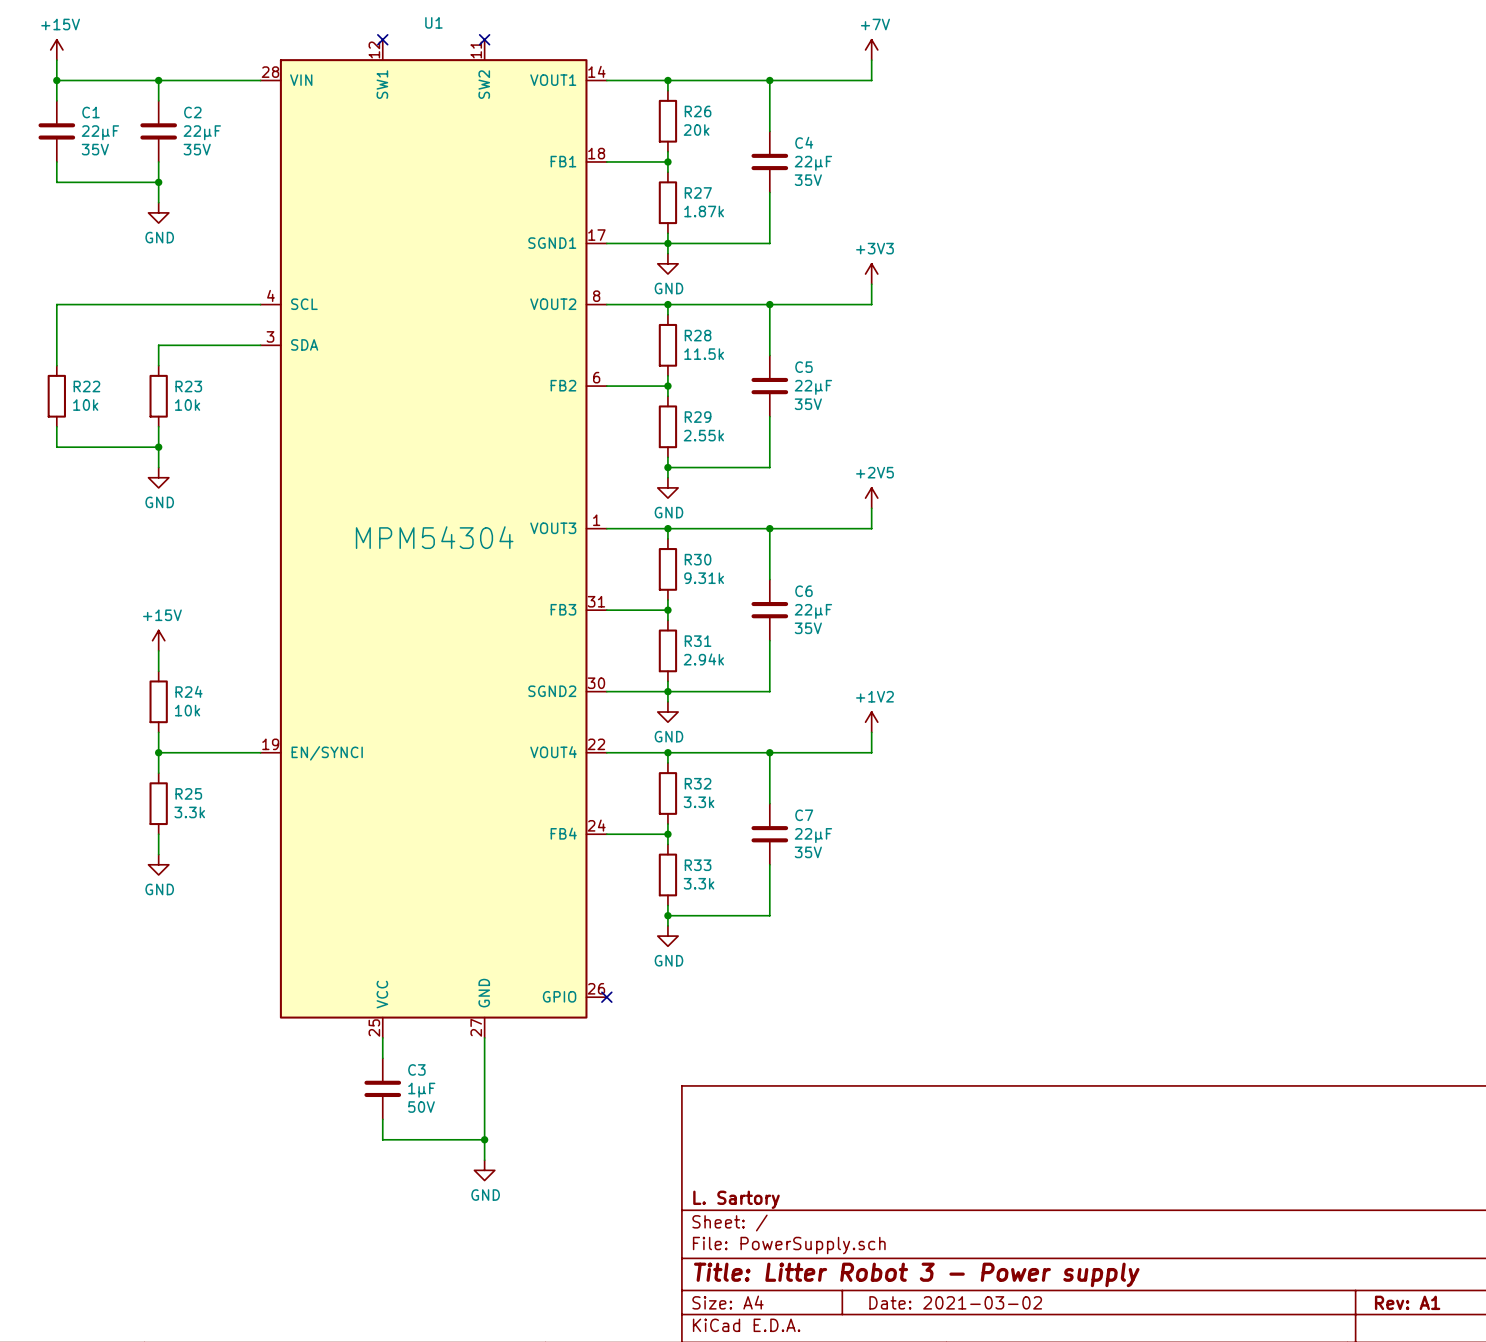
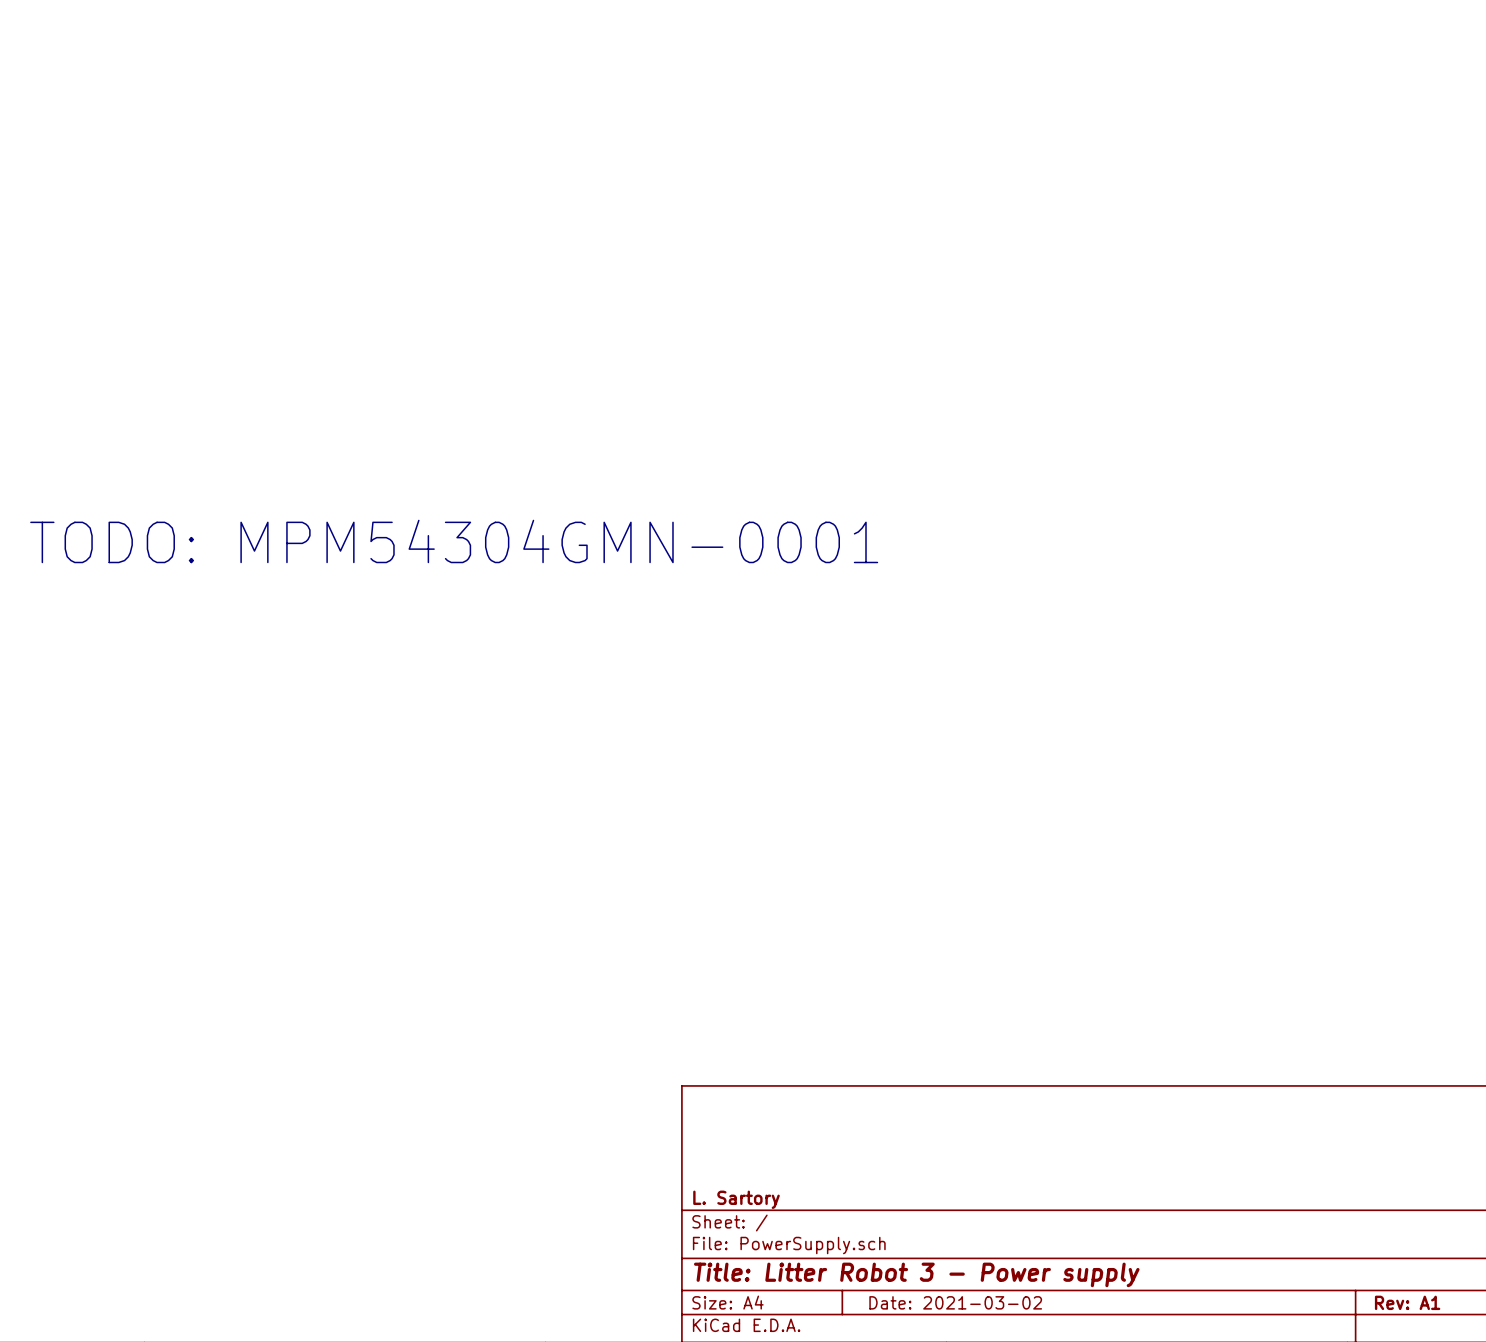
no-connect mark: (382, 39) -> none
no-connect mark: (484, 39) -> none
power symbol: +15V (56, 49) -> none
power symbol: +7V (871, 49) -> none
wire: (56, 60) (56, 100) -> none
wire: (871, 60) (871, 80) (606, 80) -> none
wire: (56, 80) (260, 80) -> none
junction: (56, 80) -> none
wire: (158, 80) (158, 100) -> none
junction: (158, 80) -> none
wire: (667, 80) (667, 90) -> none
junction: (667, 80) -> none
wire: (769, 80) (769, 131) -> none
junction: (769, 80) -> none
R26: 20k (667, 121) -> none
C1: 22µF (56, 131) -> none
C2: 22µF (158, 131) -> none
wire: (667, 151) (667, 172) -> none
wire: (56, 161) (56, 182) (158, 182) -> none
wire: (158, 161) (158, 202) -> none
wire: (606, 161) (667, 161) -> none
junction: (667, 161) -> none
C4: 22µF (769, 161) -> none
junction: (158, 182) -> none
wire: (769, 192) (769, 243) (606, 243) -> none
R27: 1.87k (667, 202) -> none
power symbol: GND (158, 212) -> none
wire: (667, 233) (667, 253) -> none
junction: (667, 243) -> none
power symbol: GND (667, 263) -> none
power symbol: +3V3 (871, 274) -> none
wire: (871, 284) (871, 304) (606, 304) -> none
wire: (260, 304) (56, 304) (56, 365) -> none
wire: (667, 304) (667, 314) -> none
junction: (667, 304) -> none
wire: (769, 304) (769, 355) -> none
junction: (769, 304) -> none
wire: (260, 345) (158, 345) (158, 365) -> none
R28: 11.5k (667, 345) -> none
wire: (667, 375) (667, 396) -> none
wire: (606, 386) (667, 386) -> none
junction: (667, 386) -> none
C5: 22µF (769, 386) -> none
R22: 10k (56, 396) -> none
R23: 10k (158, 396) -> none
wire: (769, 416) (769, 467) (667, 467) -> none
wire: (56, 426) (56, 447) (158, 447) -> none
wire: (158, 426) (158, 467) -> none
R29: 2.55k (667, 426) -> none
junction: (158, 447) -> none
wire: (667, 457) (667, 477) -> none
junction: (667, 467) -> none
power symbol: GND (158, 477) -> none
power symbol: GND (667, 487) -> none
power symbol: +2V5 (871, 498) -> none
wire: (871, 508) (871, 528) (606, 528) -> none
wire: (667, 528) (667, 538) -> none
junction: (667, 528) -> none
wire: (769, 528) (769, 579) -> none
junction: (769, 528) -> none
U1: MPM54304 (433, 538) -> none
text: none -> TODO: MPM54304GMN-0001 (454, 541)
R30: 9.31k (667, 569) -> none
wire: (667, 599) (667, 620) -> none
wire: (606, 610) (667, 610) -> none
junction: (667, 610) -> none
C6: 22µF (769, 610) -> none
power symbol: +15V (158, 640) -> none
wire: (769, 640) (769, 691) (606, 691) -> none
wire: (158, 650) (158, 671) -> none
R31: 2.94k (667, 650) -> none
wire: (667, 681) (667, 701) -> none
junction: (667, 691) -> none
R24: 10k (158, 701) -> none
power symbol: GND (667, 712) -> none
power symbol: +1V2 (871, 722) -> none
wire: (158, 732) (158, 773) -> none
wire: (871, 732) (871, 752) (606, 752) -> none
wire: (158, 752) (260, 752) -> none
junction: (158, 752) -> none
wire: (667, 752) (667, 762) -> none
junction: (667, 752) -> none
wire: (769, 752) (769, 803) -> none
junction: (769, 752) -> none
R32: 3.3k (667, 793) -> none
R25: 3.3k (158, 803) -> none
wire: (667, 824) (667, 844) -> none
wire: (158, 834) (158, 854) -> none
wire: (606, 834) (667, 834) -> none
junction: (667, 834) -> none
C7: 22µF (769, 834) -> none
power symbol: GND (158, 864) -> none
wire: (769, 864) (769, 915) (667, 915) -> none
R33: 3.3k (667, 874) -> none
wire: (667, 905) (667, 925) -> none
junction: (667, 915) -> none
power symbol: GND (667, 936) -> none
no-connect mark: (606, 997) -> none
wire: (382, 1037) (382, 1058) -> none
wire: (484, 1037) (484, 1160) -> none
C3: 1µF (382, 1088) -> none
wire: (382, 1119) (382, 1139) (484, 1139) -> none
junction: (484, 1139) -> none
power symbol: GND (484, 1170) -> none

